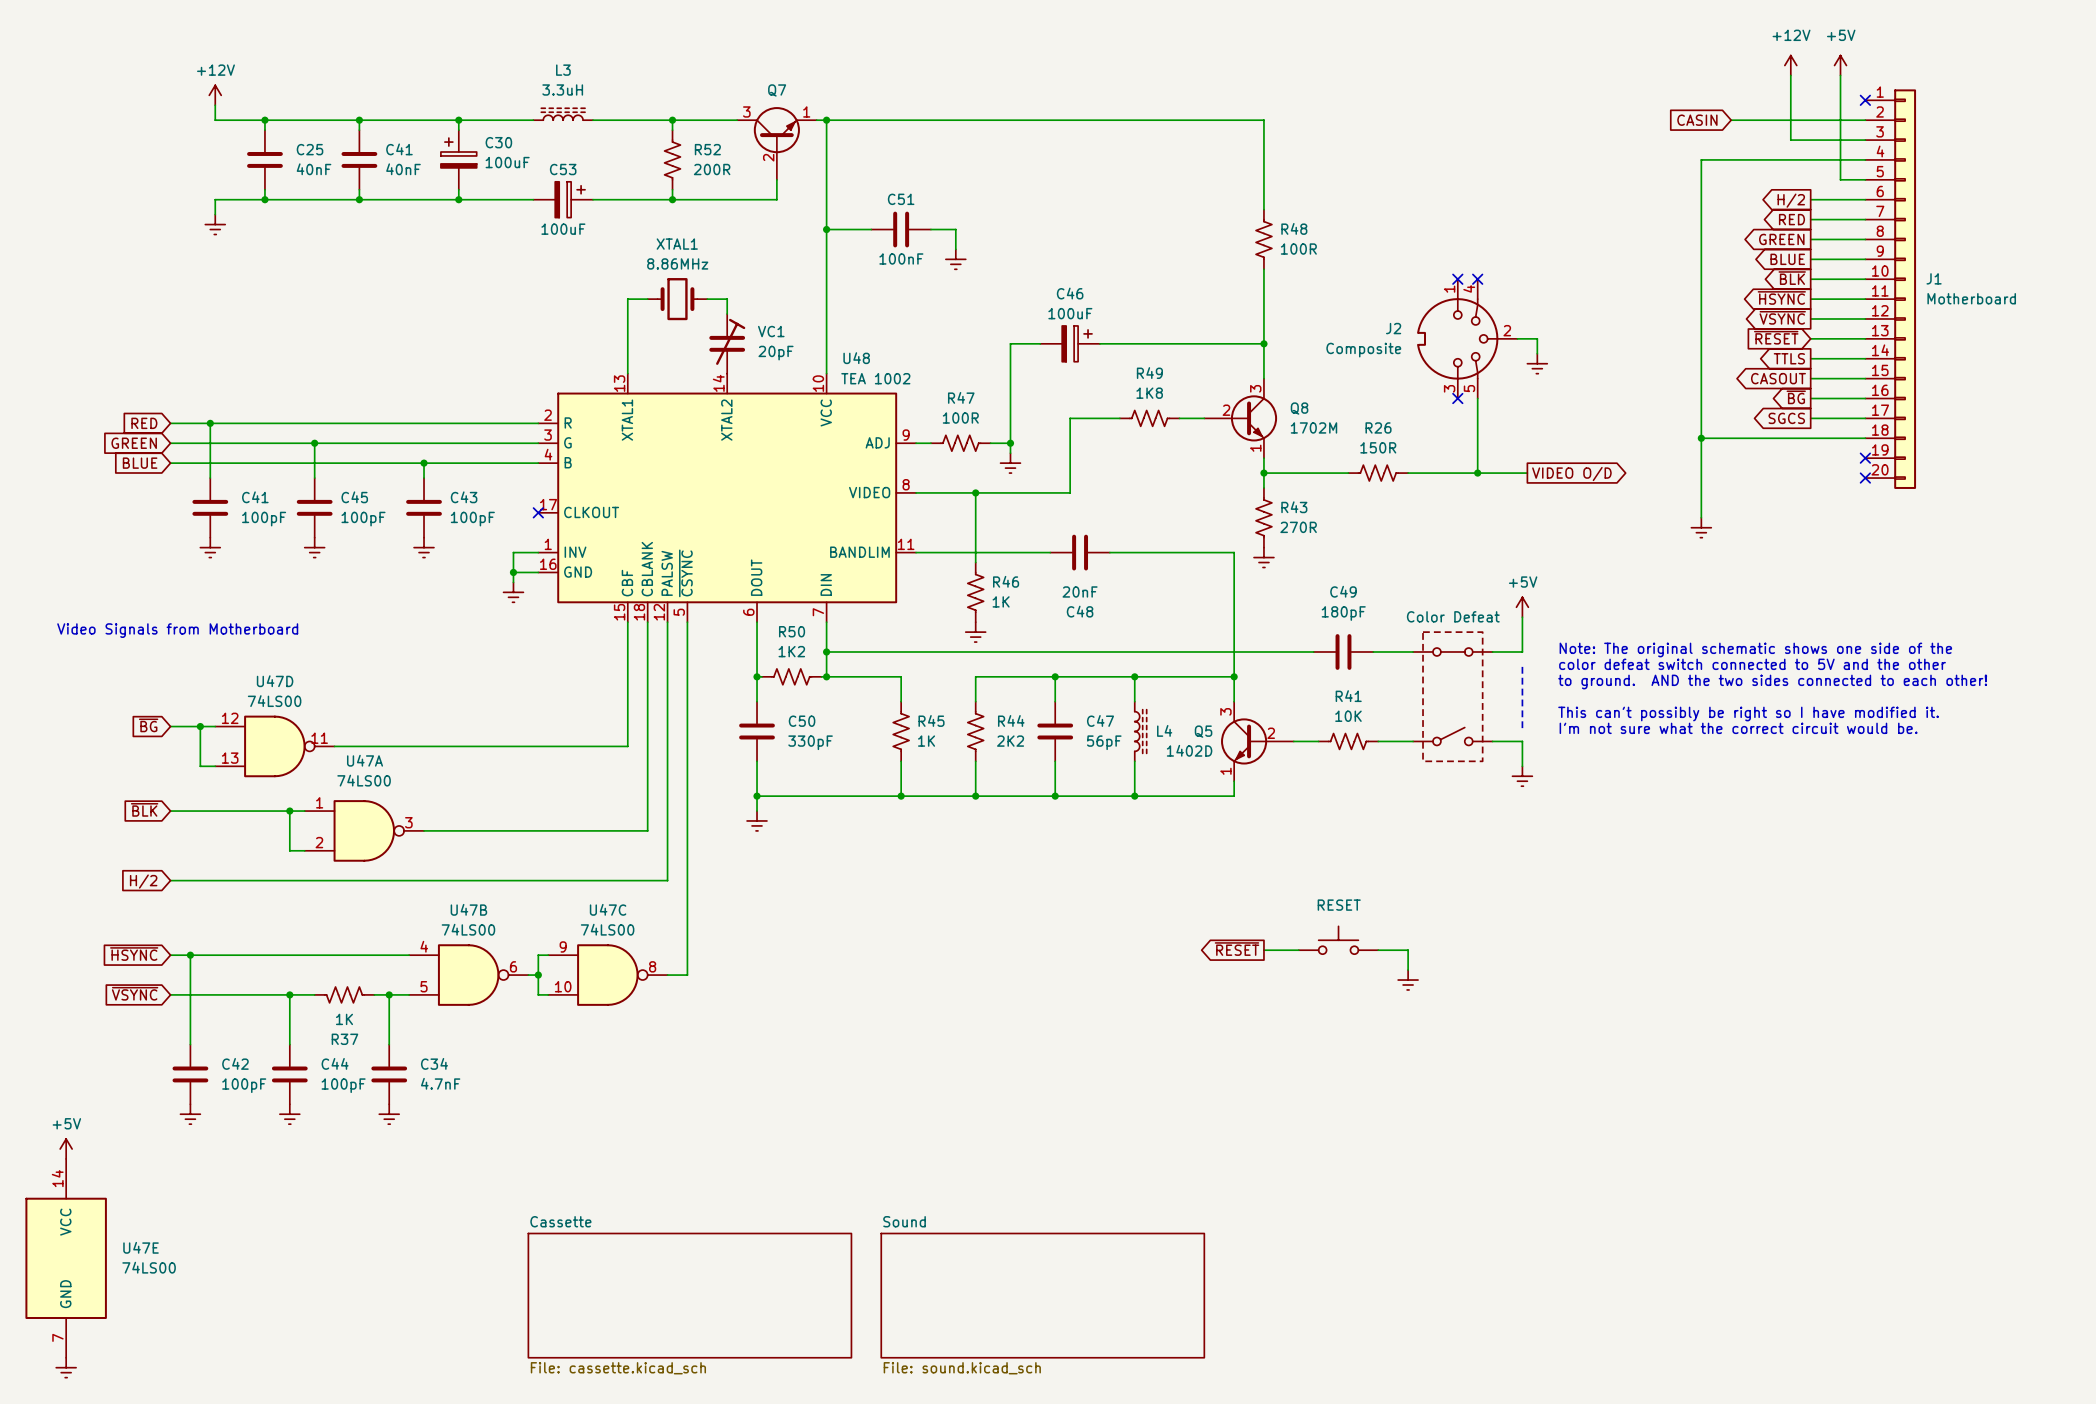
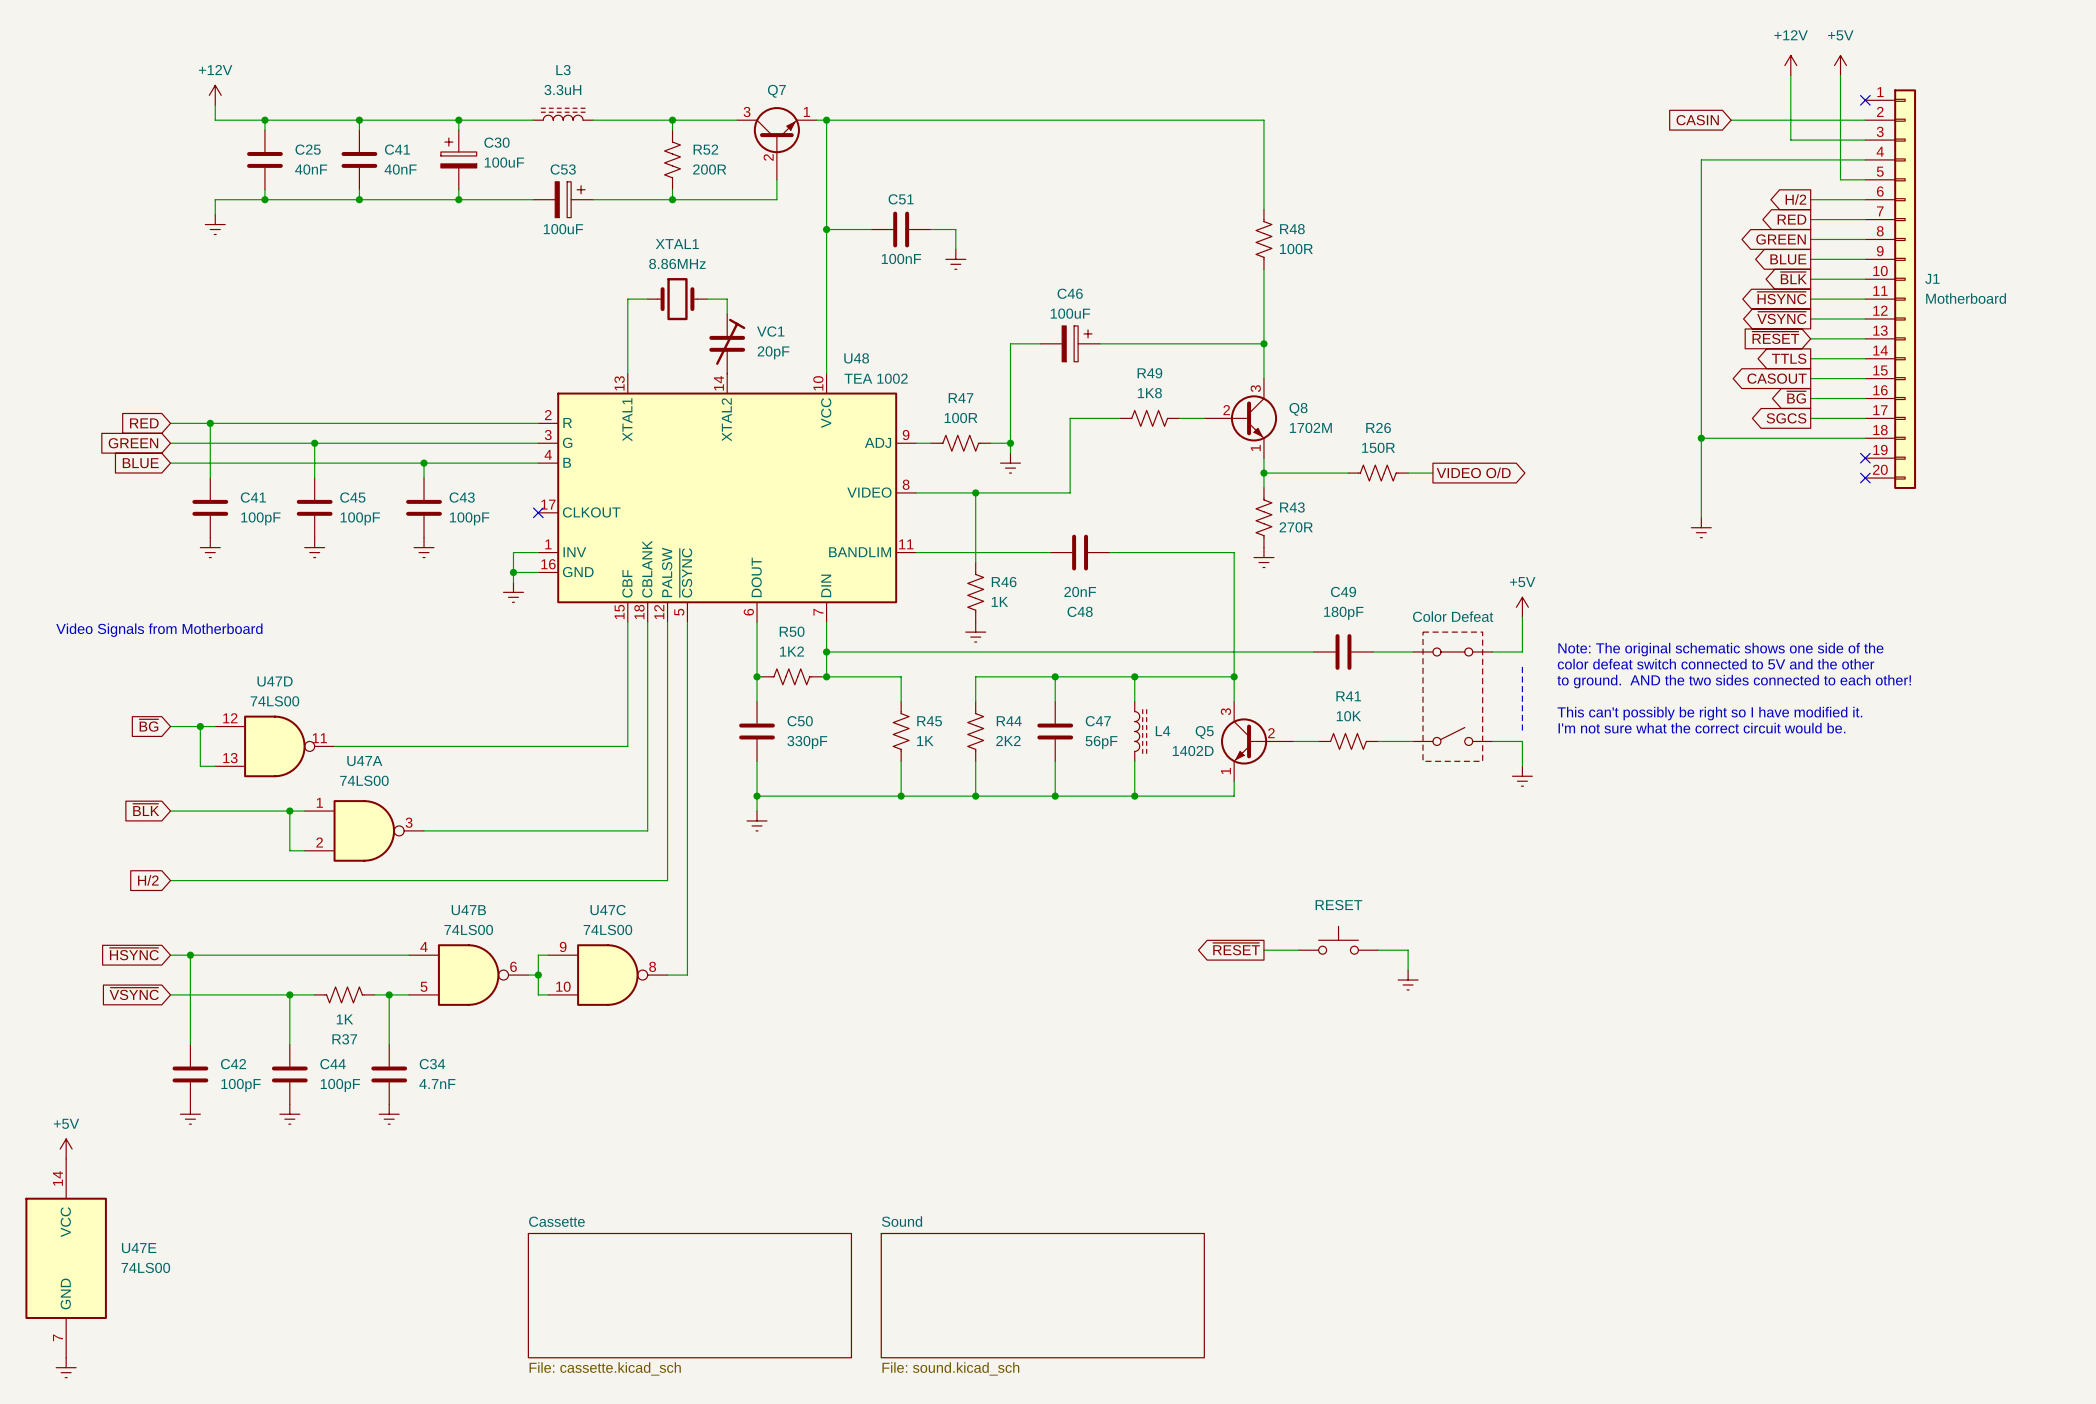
no-connect mark: (1457, 279) -> none
no-connect mark: (1477, 279) -> none
J2: Composite (1467, 338) -> none
wire: (1517, 338) (1537, 338) (1537, 353) -> none
power symbol: (1537, 363) -> none
no-connect mark: (1457, 398) -> none
wire: (1477, 398) (1477, 473) -> none
wire: (1432, 473) (1527, 473) -> none
junction: (1477, 473) -> none
global label position: VIDEO O/D (1571, 474) -> VIDEO O/D (1473, 472)

